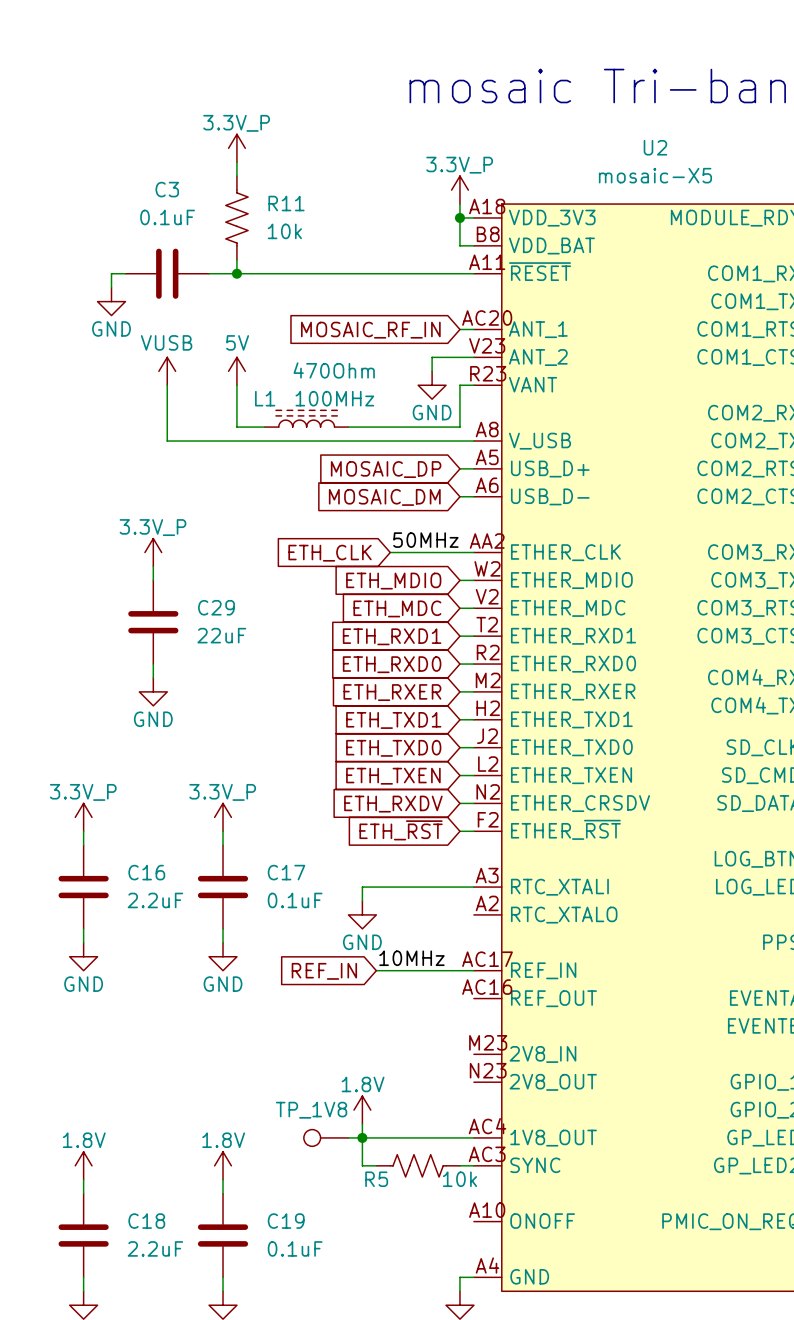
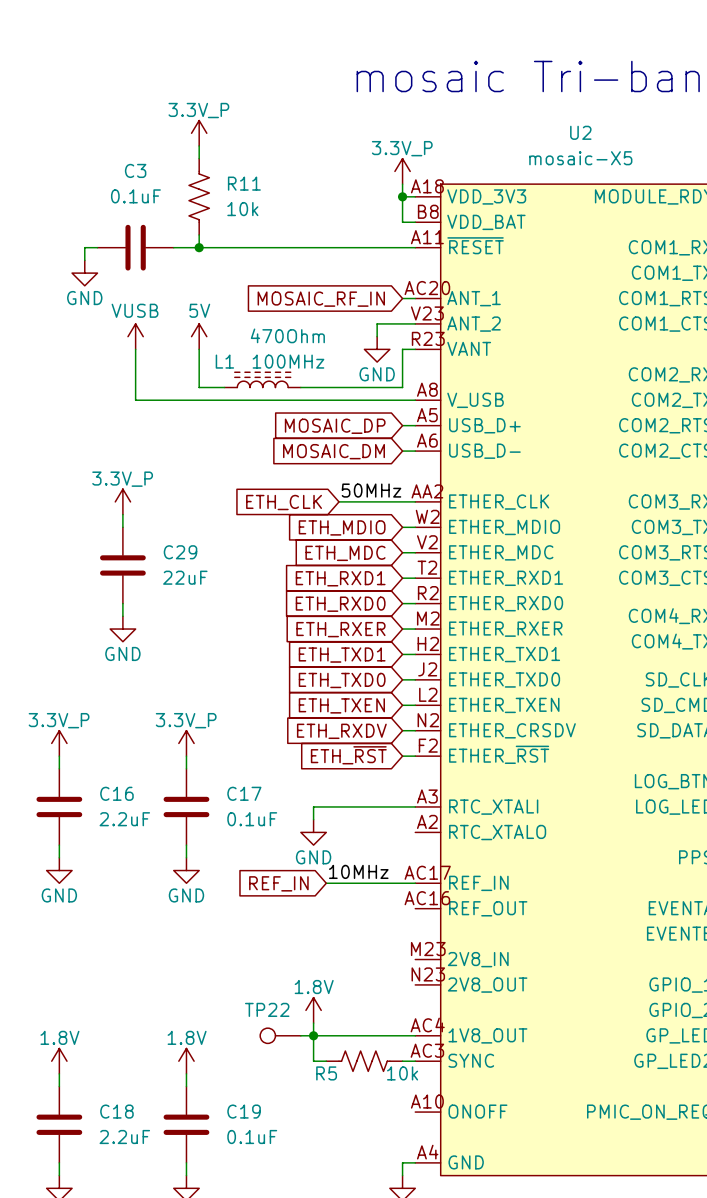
TP_1V8 name: TP_1V8 (311, 1110) -> TP22 (267, 1009)

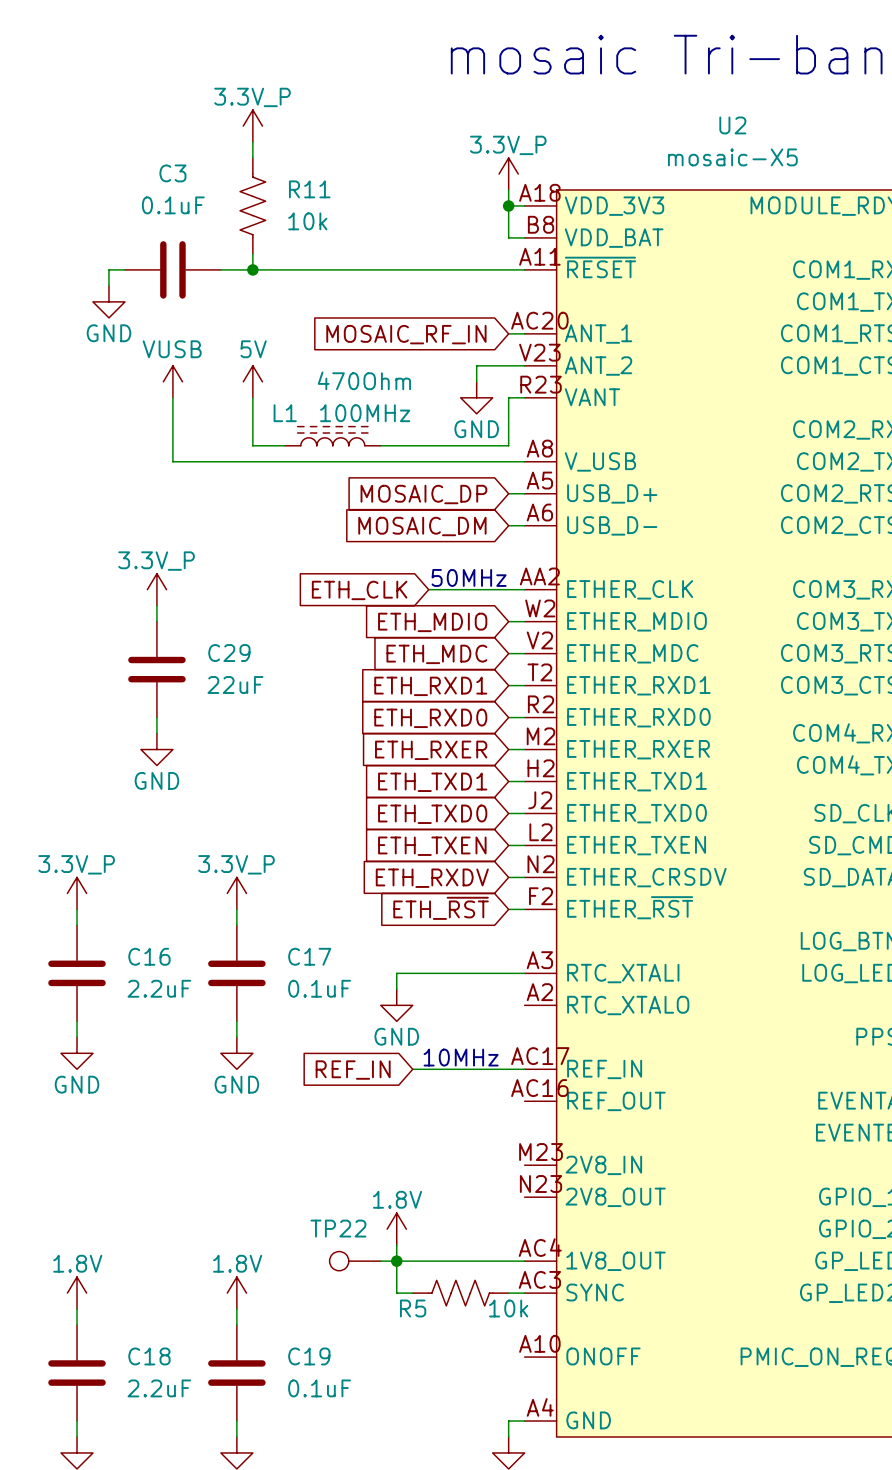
label: 50MHz (371, 490) -> none
text: none -> 50MHz (469, 577)
label: 10MHz (358, 871) -> none
text: none -> 10MHz (461, 1057)

